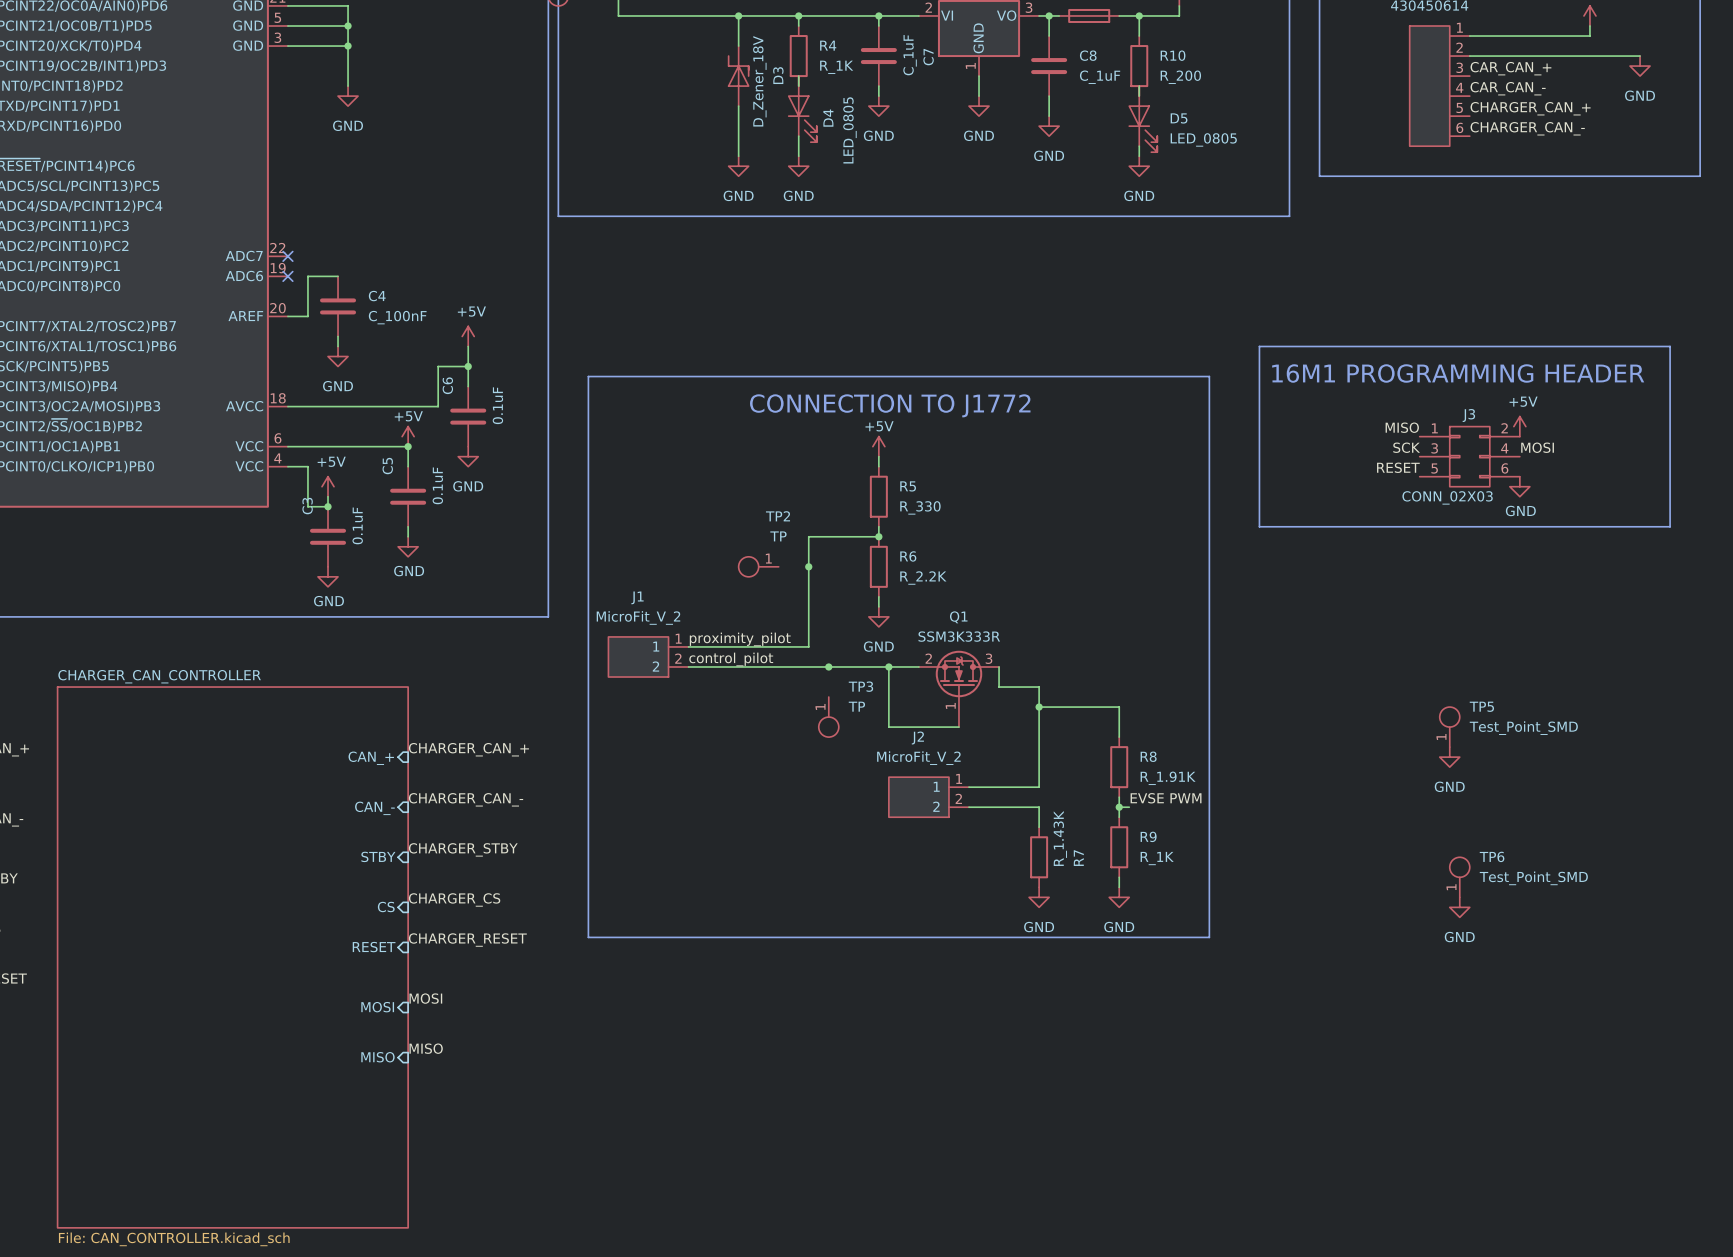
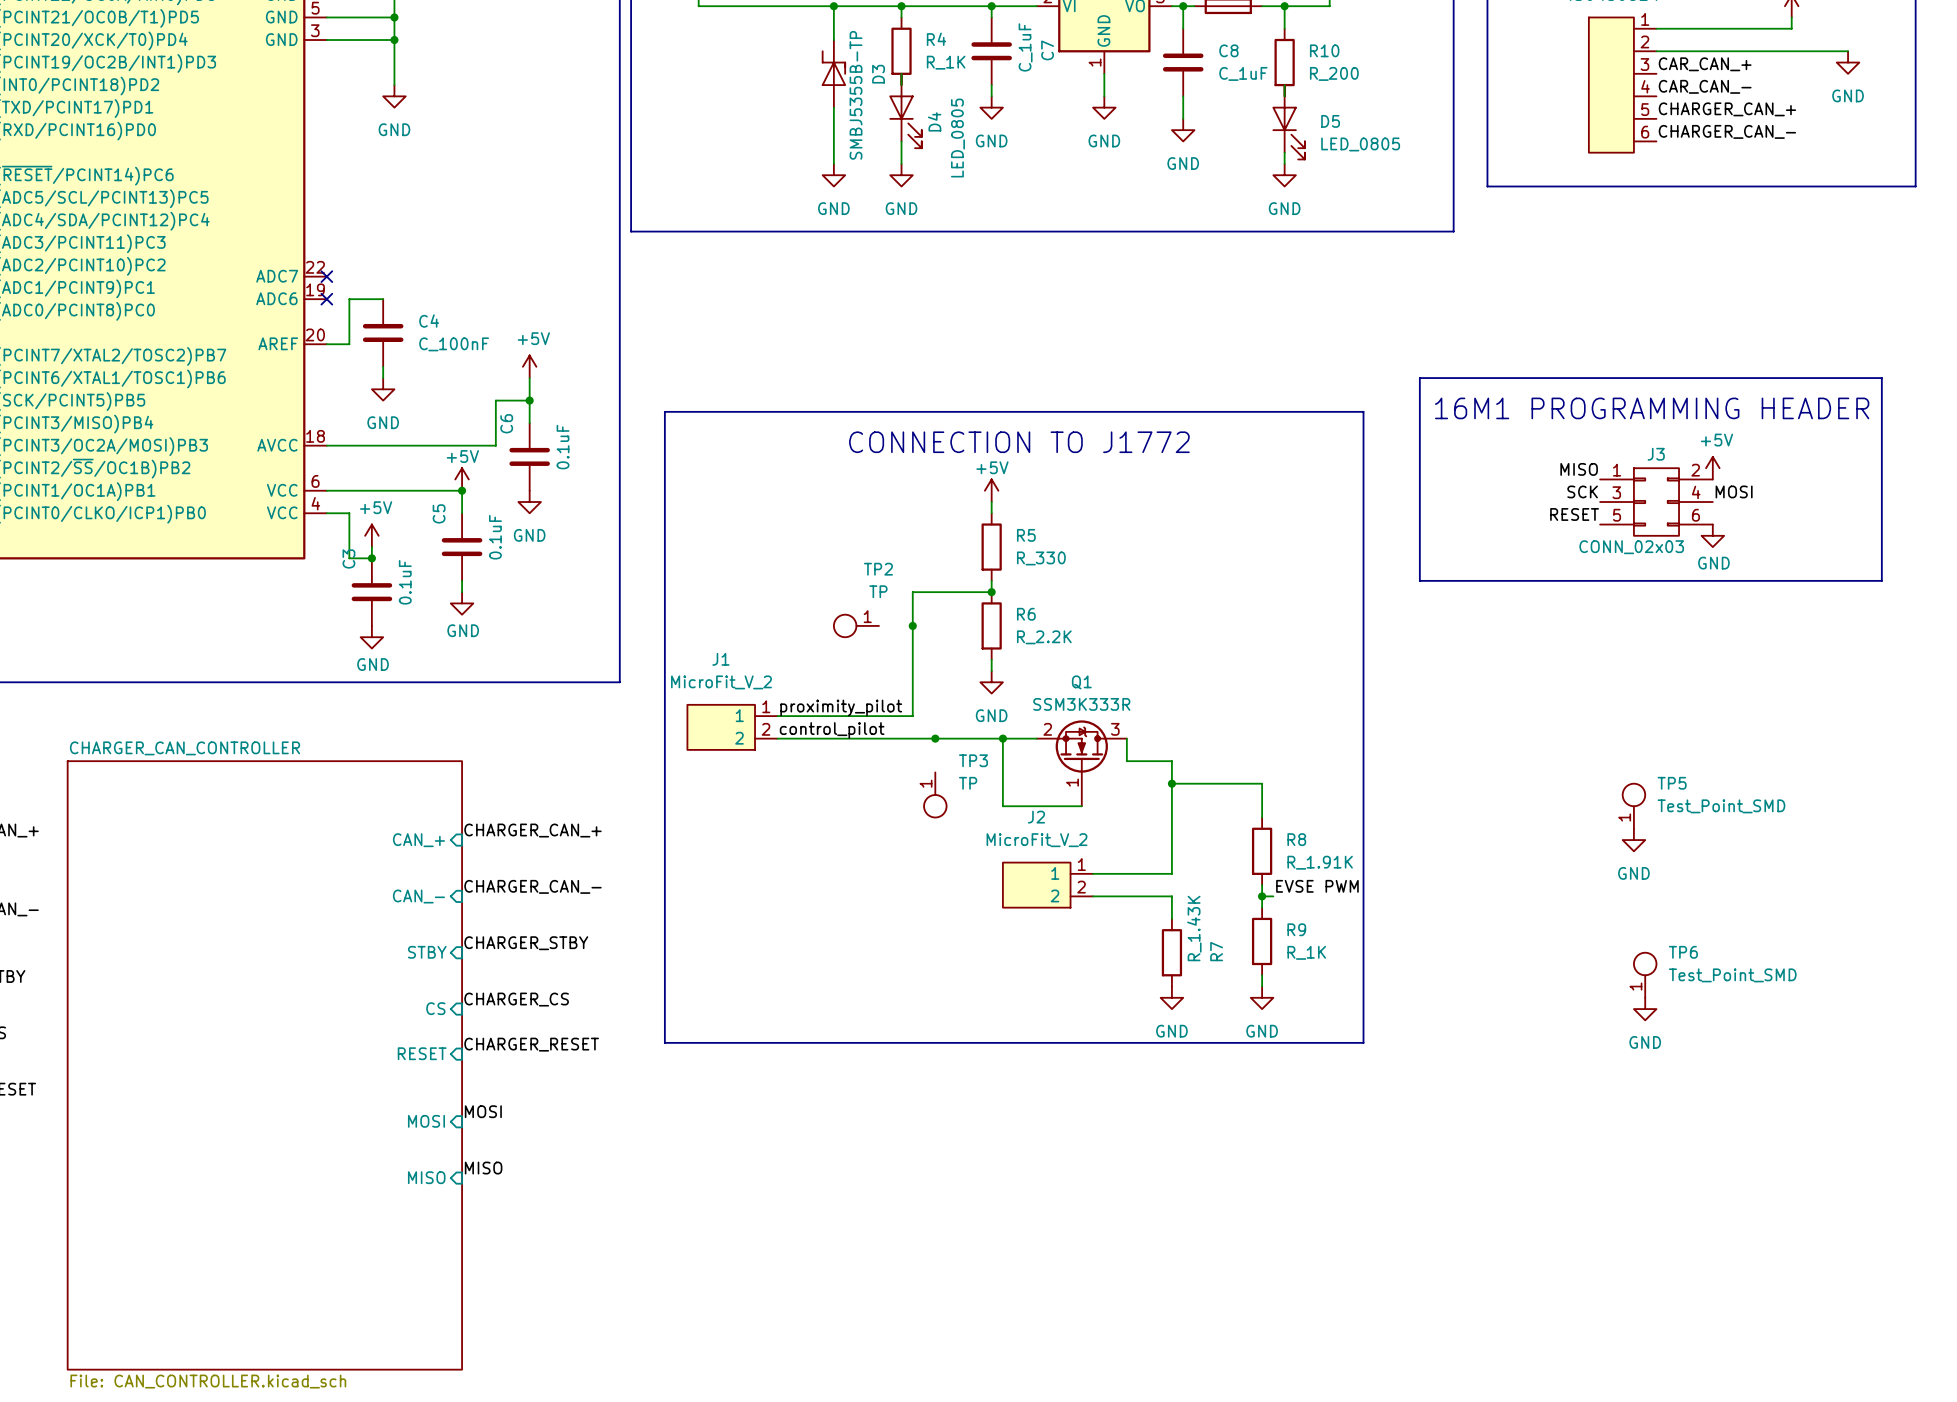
D3 value: D_Zener_18V (759, 81) -> SMBJ5355B-TP (856, 95)
J3 value: CONN_02X03 (1447, 497) -> CONN_02x03 (1631, 547)

